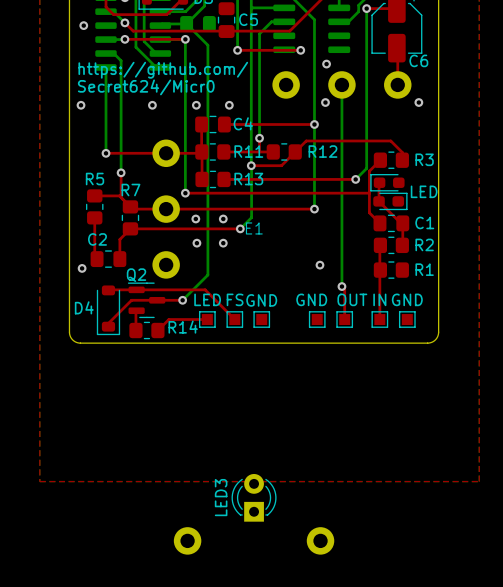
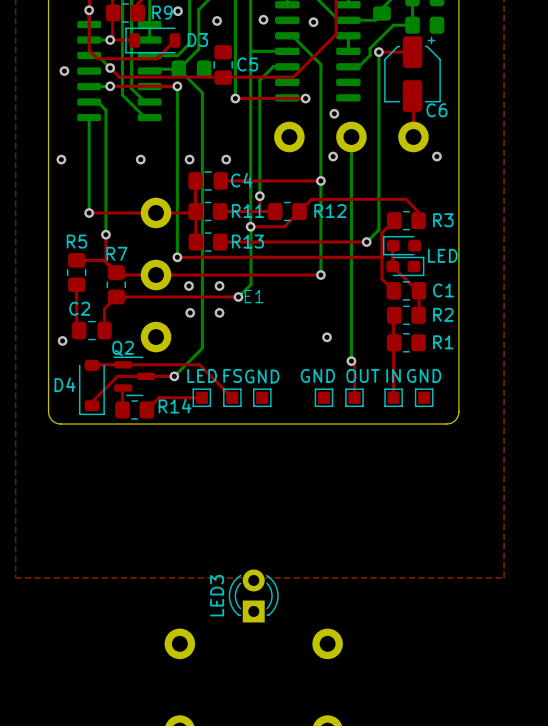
text: https://github.com/ (163, 70) -> none
text: Secret624/Micr0 (146, 87) -> none

